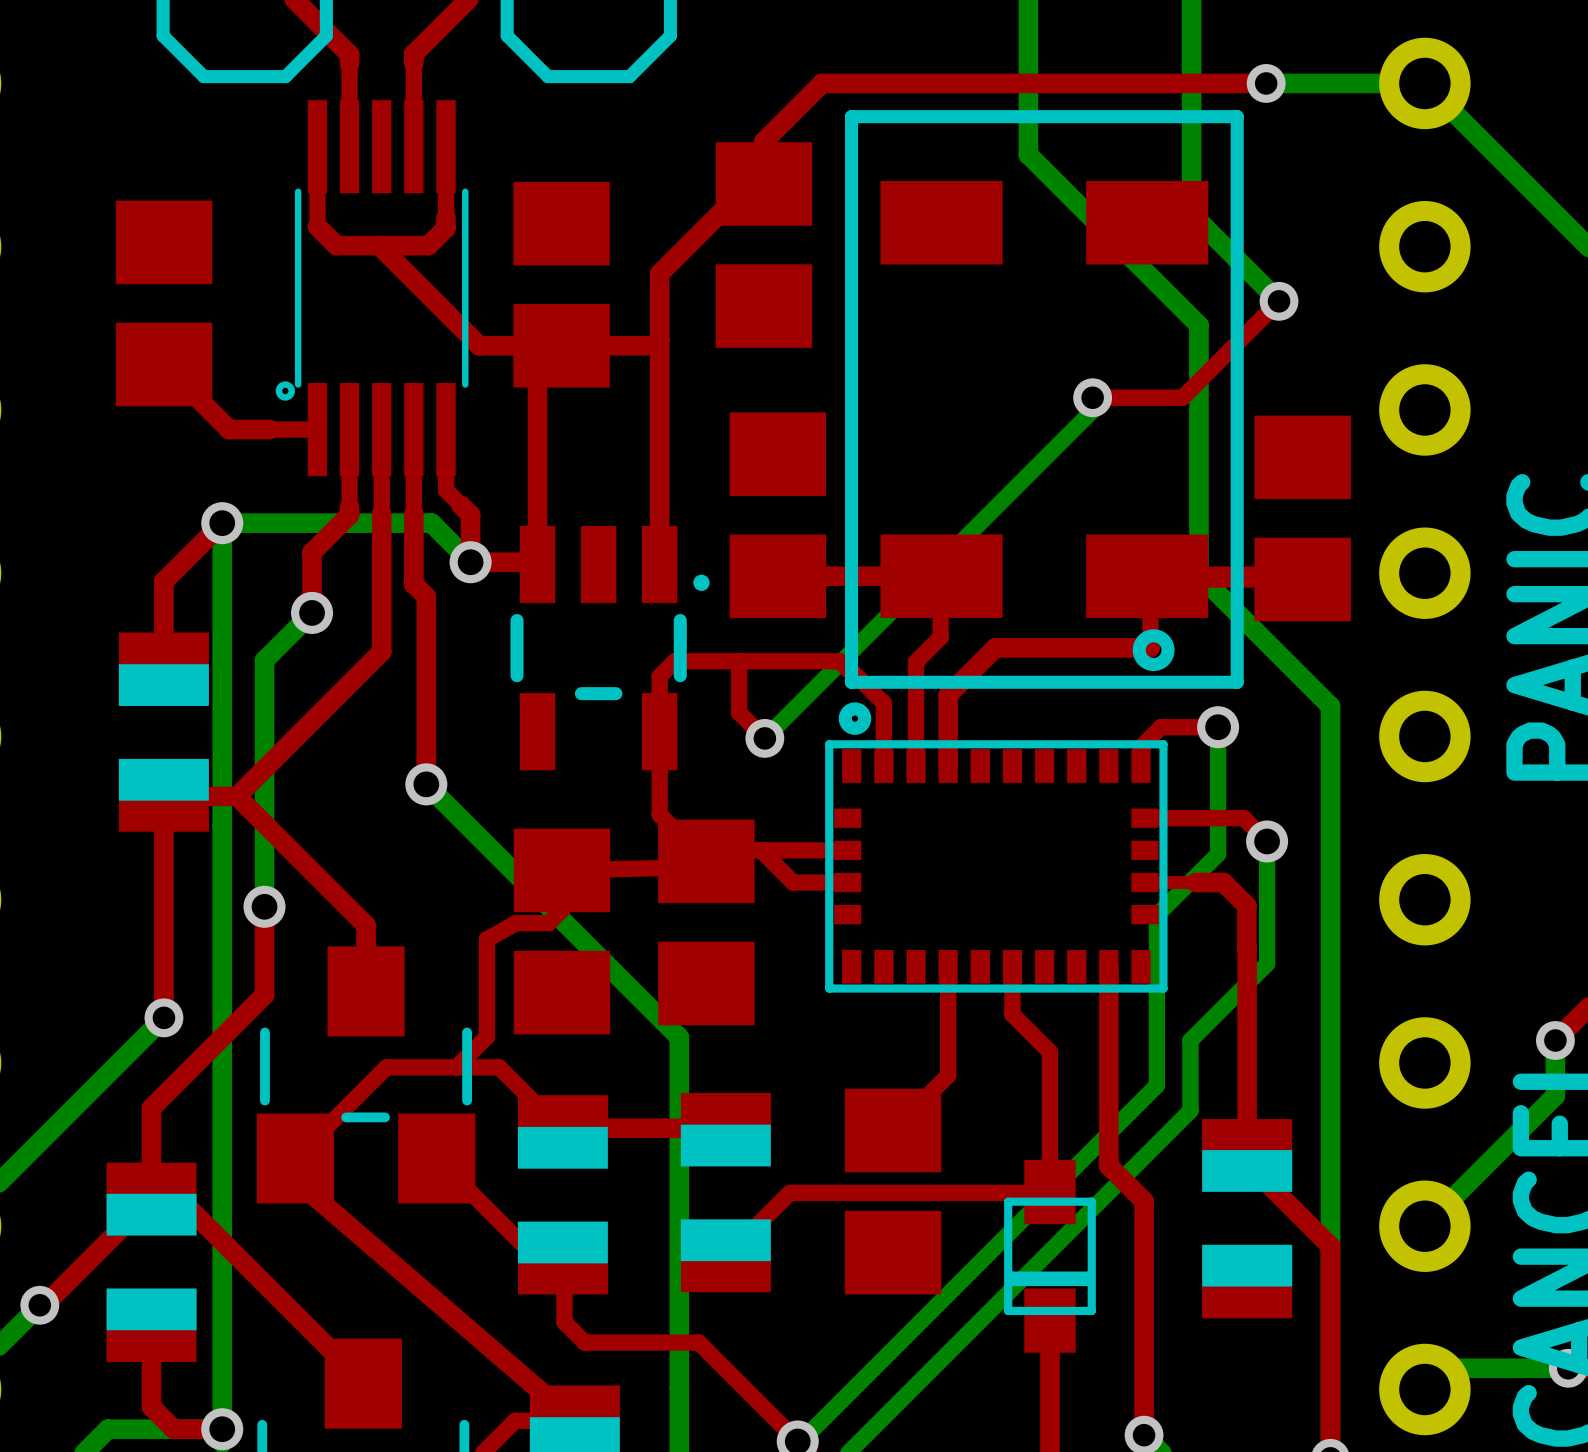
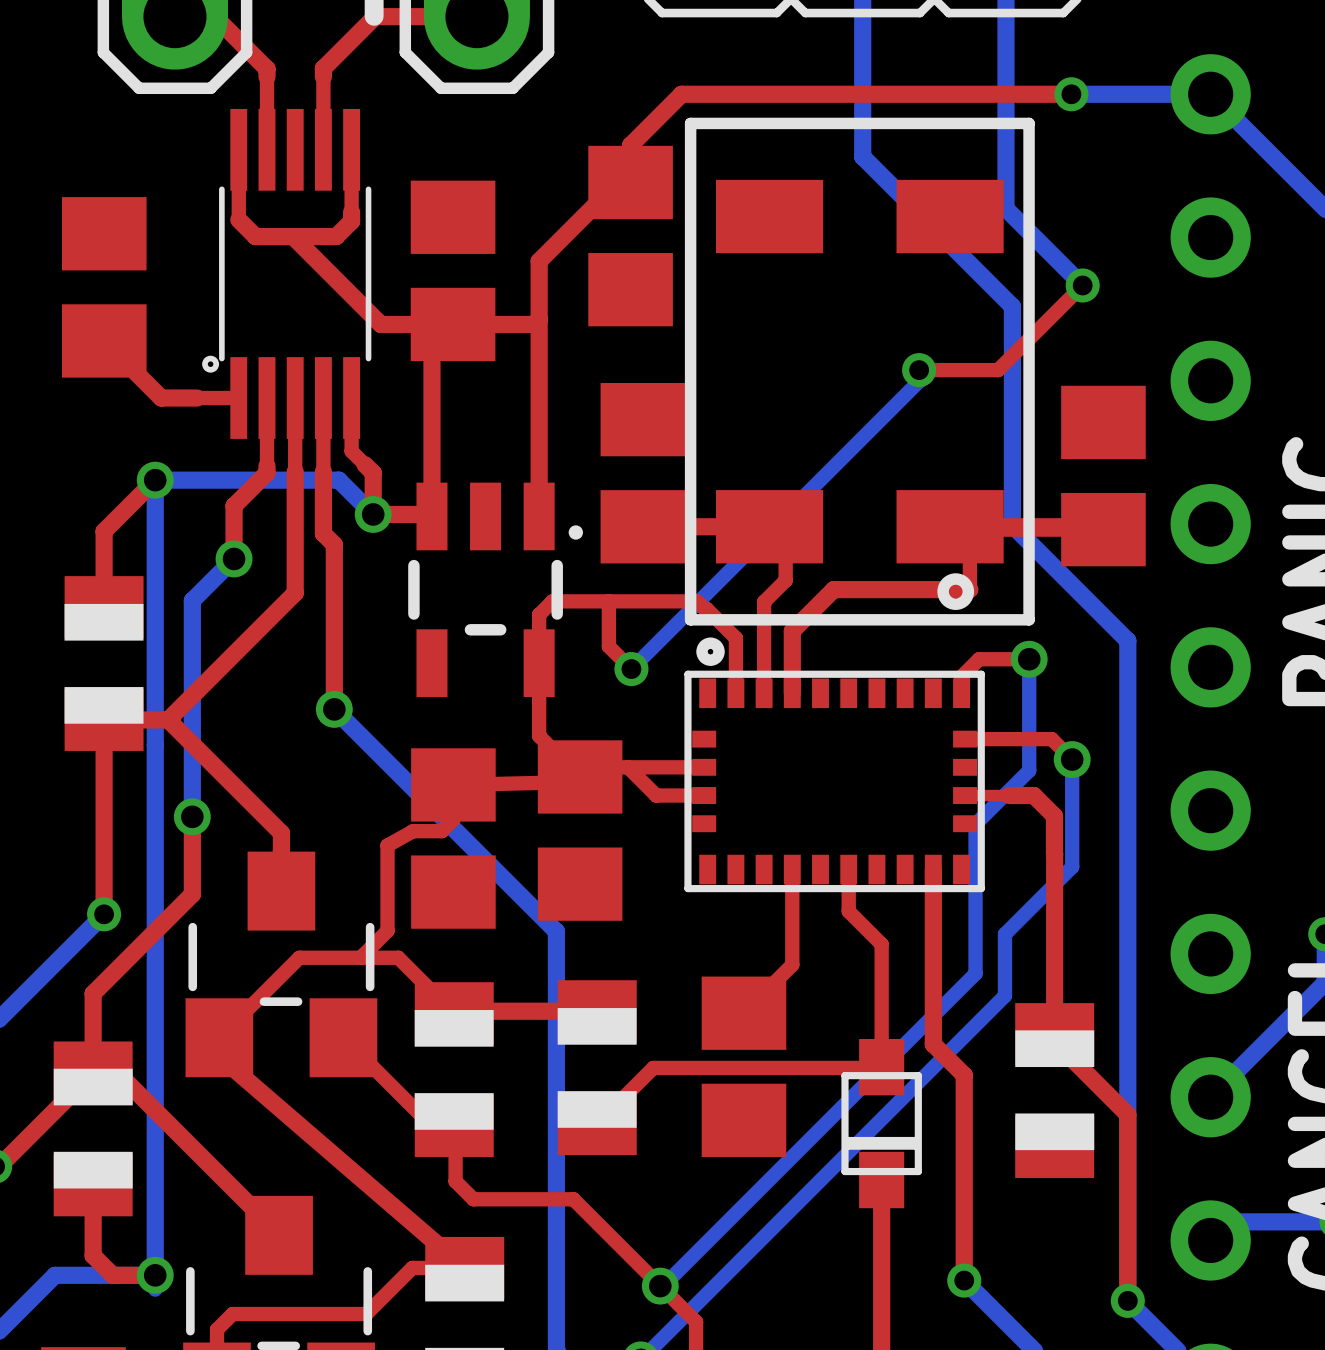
part position: (1044, 399) -> (859, 371)

